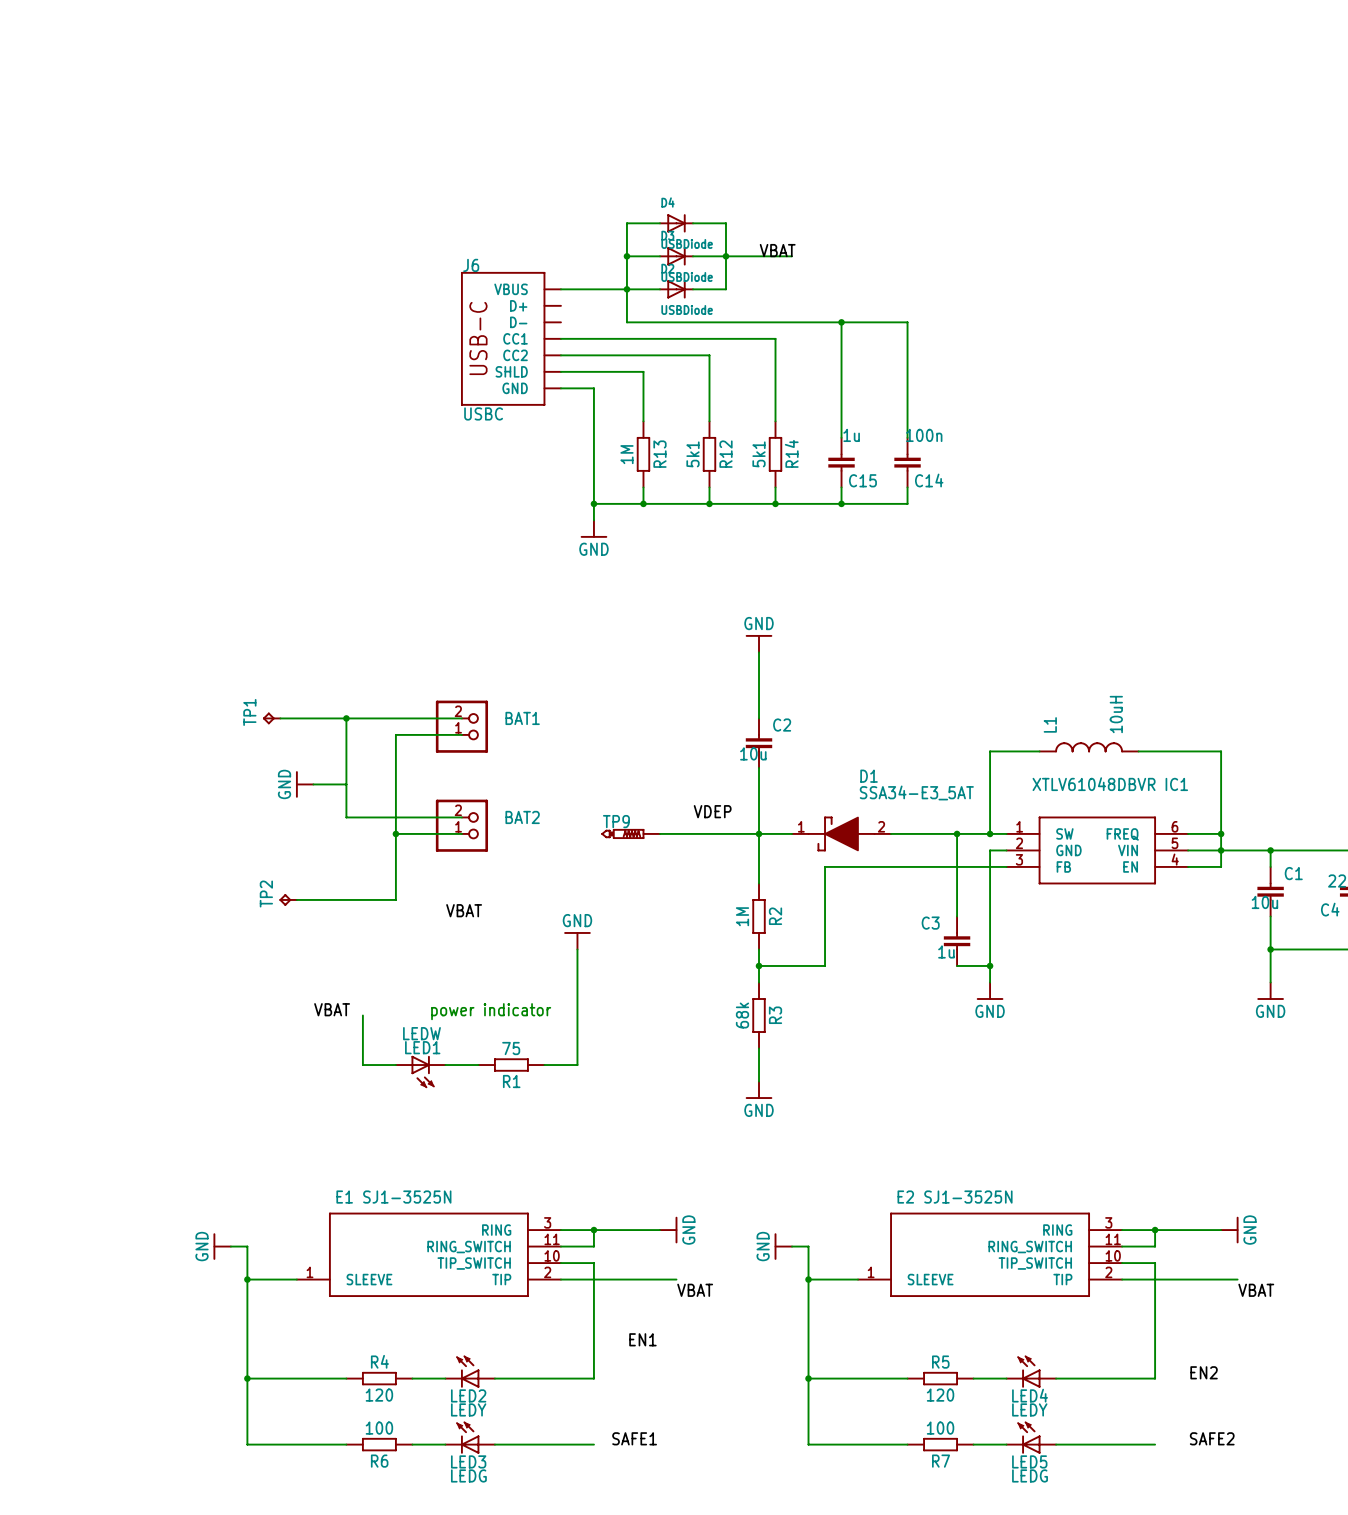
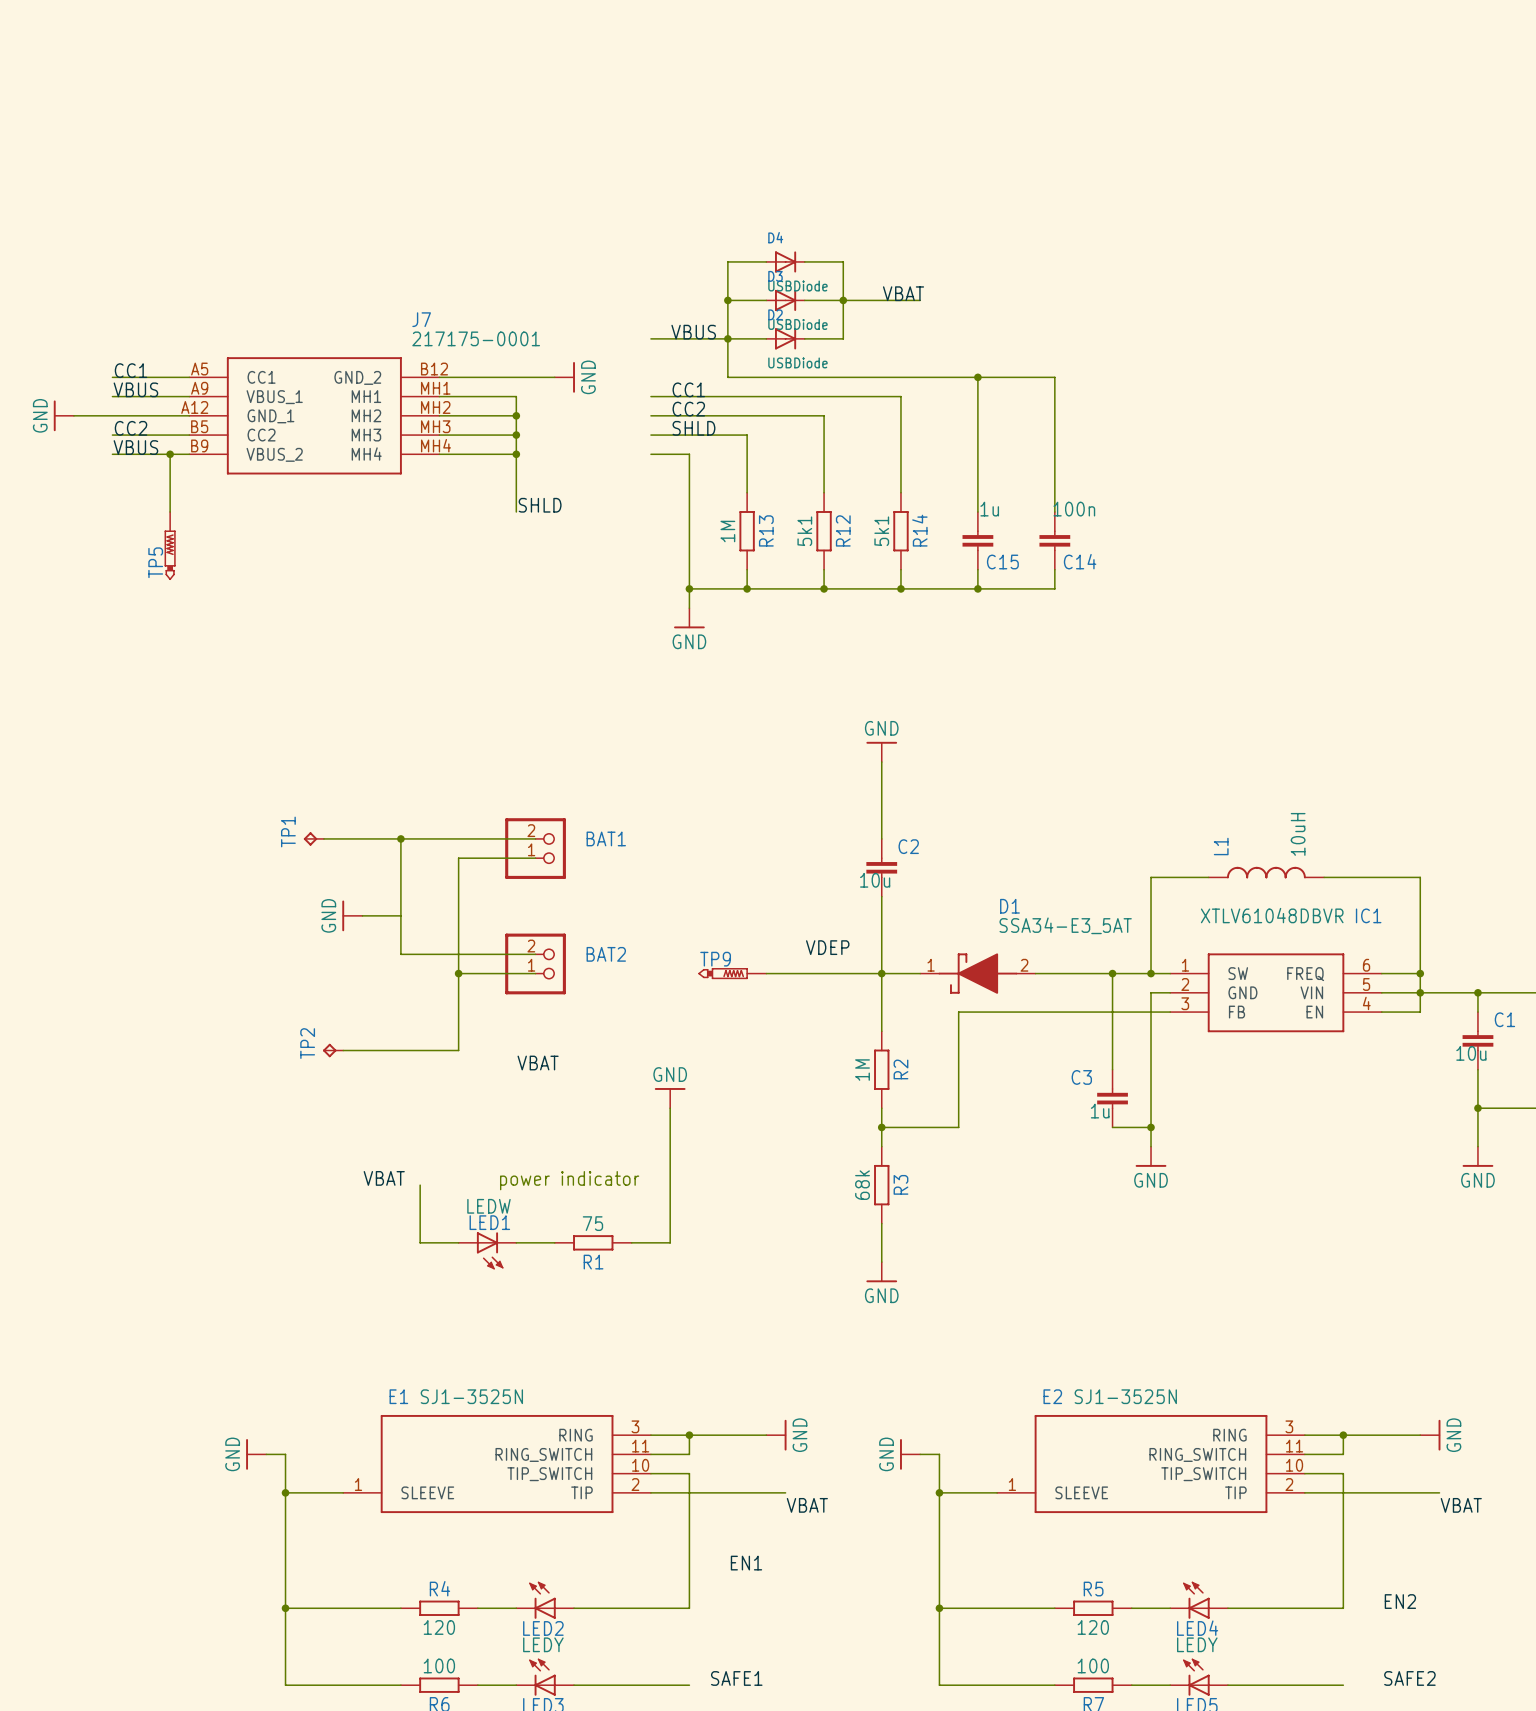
label: none -> VBUS (693, 332)
label: none -> CC1 (131, 370)
wire: none -> (112, 377) (189, 377)
wire: none -> (439, 377) (554, 377)
power symbol: none -> GND (564, 377)
label: none -> VBUS (135, 389)
label: none -> CC1 (688, 389)
wire: none -> (112, 396) (189, 396)
wire: none -> (439, 396) (516, 396) (516, 511)
J6: USBC (511, 338) -> none
label: none -> CC2 (688, 409)
power symbol: none -> GND (63, 415)
wire: none -> (73, 415) (189, 415)
J7: none -> 217175-0001 (314, 415)
wire: none -> (439, 415) (516, 415)
junction: none -> (516, 415)
label: none -> CC2 (131, 428)
label: none -> SHLD (693, 428)
wire: none -> (112, 435) (189, 435)
wire: none -> (439, 435) (516, 435)
junction: none -> (516, 435)
label: none -> VBUS (135, 447)
wire: none -> (112, 454) (189, 454)
wire: none -> (170, 454) (170, 511)
junction: none -> (170, 454)
wire: none -> (439, 454) (516, 454)
junction: none -> (516, 454)
label: none -> SHLD (540, 505)
TP5: none -> (170, 545)

